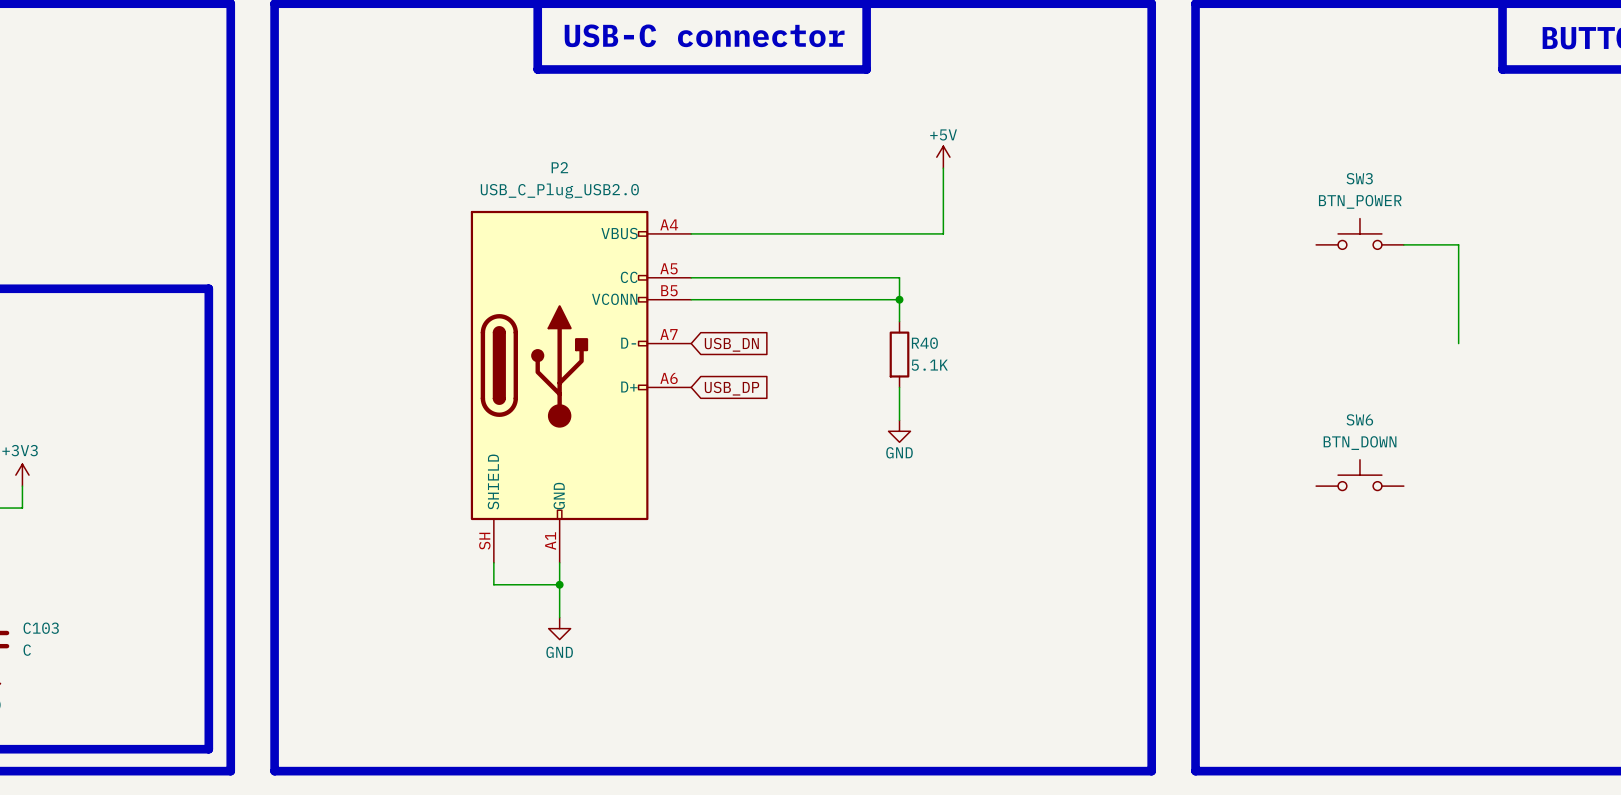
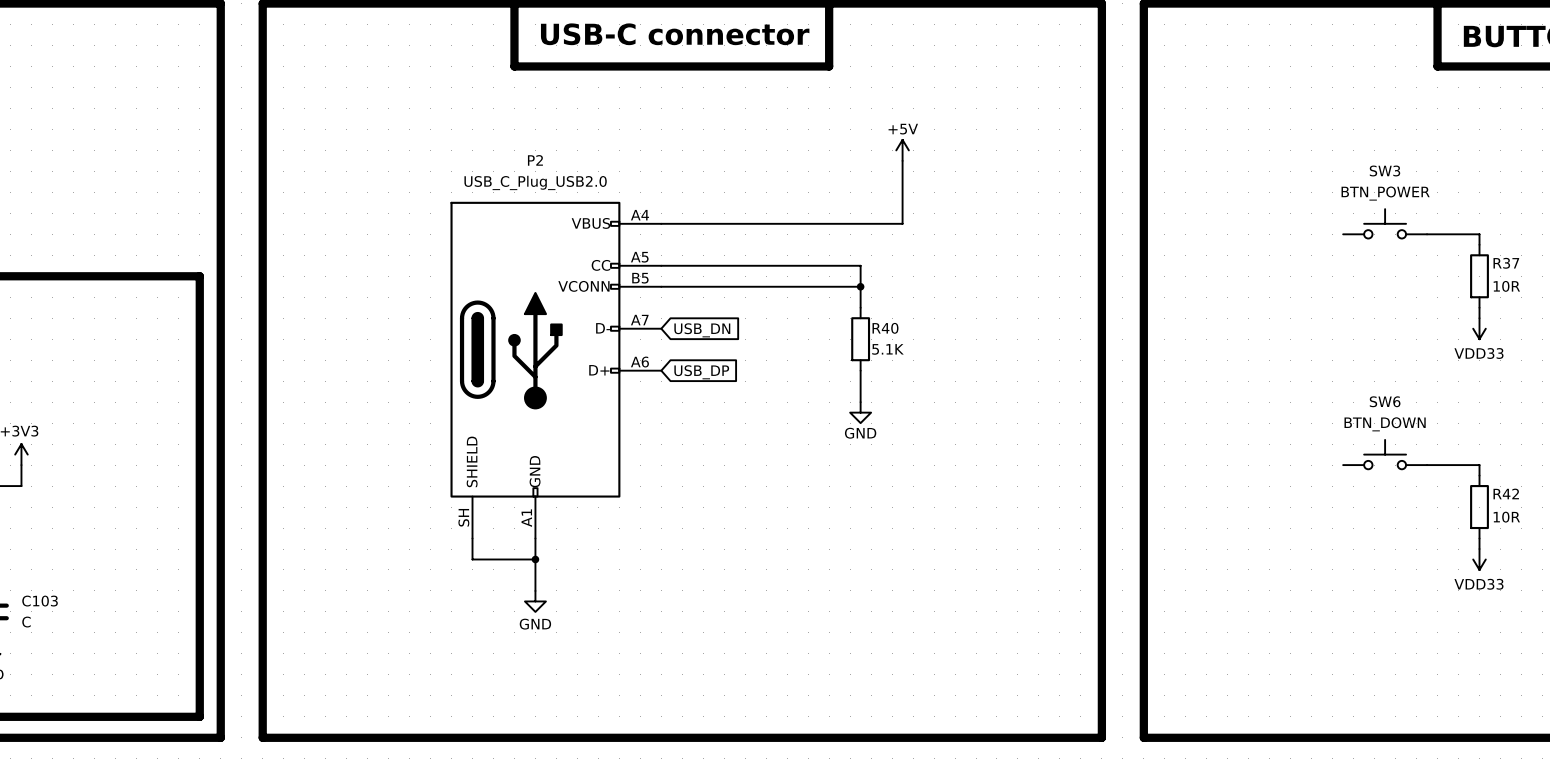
SW3 position: (1359, 233) -> (1385, 223)
wire: (1403, 244) (1458, 244) (1458, 343) -> none
wire: none -> (1427, 234) (1479, 234) (1479, 244)
R37: none -> 10R (1479, 276)
wire: none -> (1479, 307) (1479, 318)
power symbol: none -> VDD33 (1479, 328)
SW6 position: (1359, 475) -> (1385, 454)
wire: none -> (1427, 465) (1479, 465) (1479, 475)
R42: none -> 10R (1479, 507)
wire: none -> (1479, 538) (1479, 549)
power symbol: none -> VDD33 (1479, 559)

